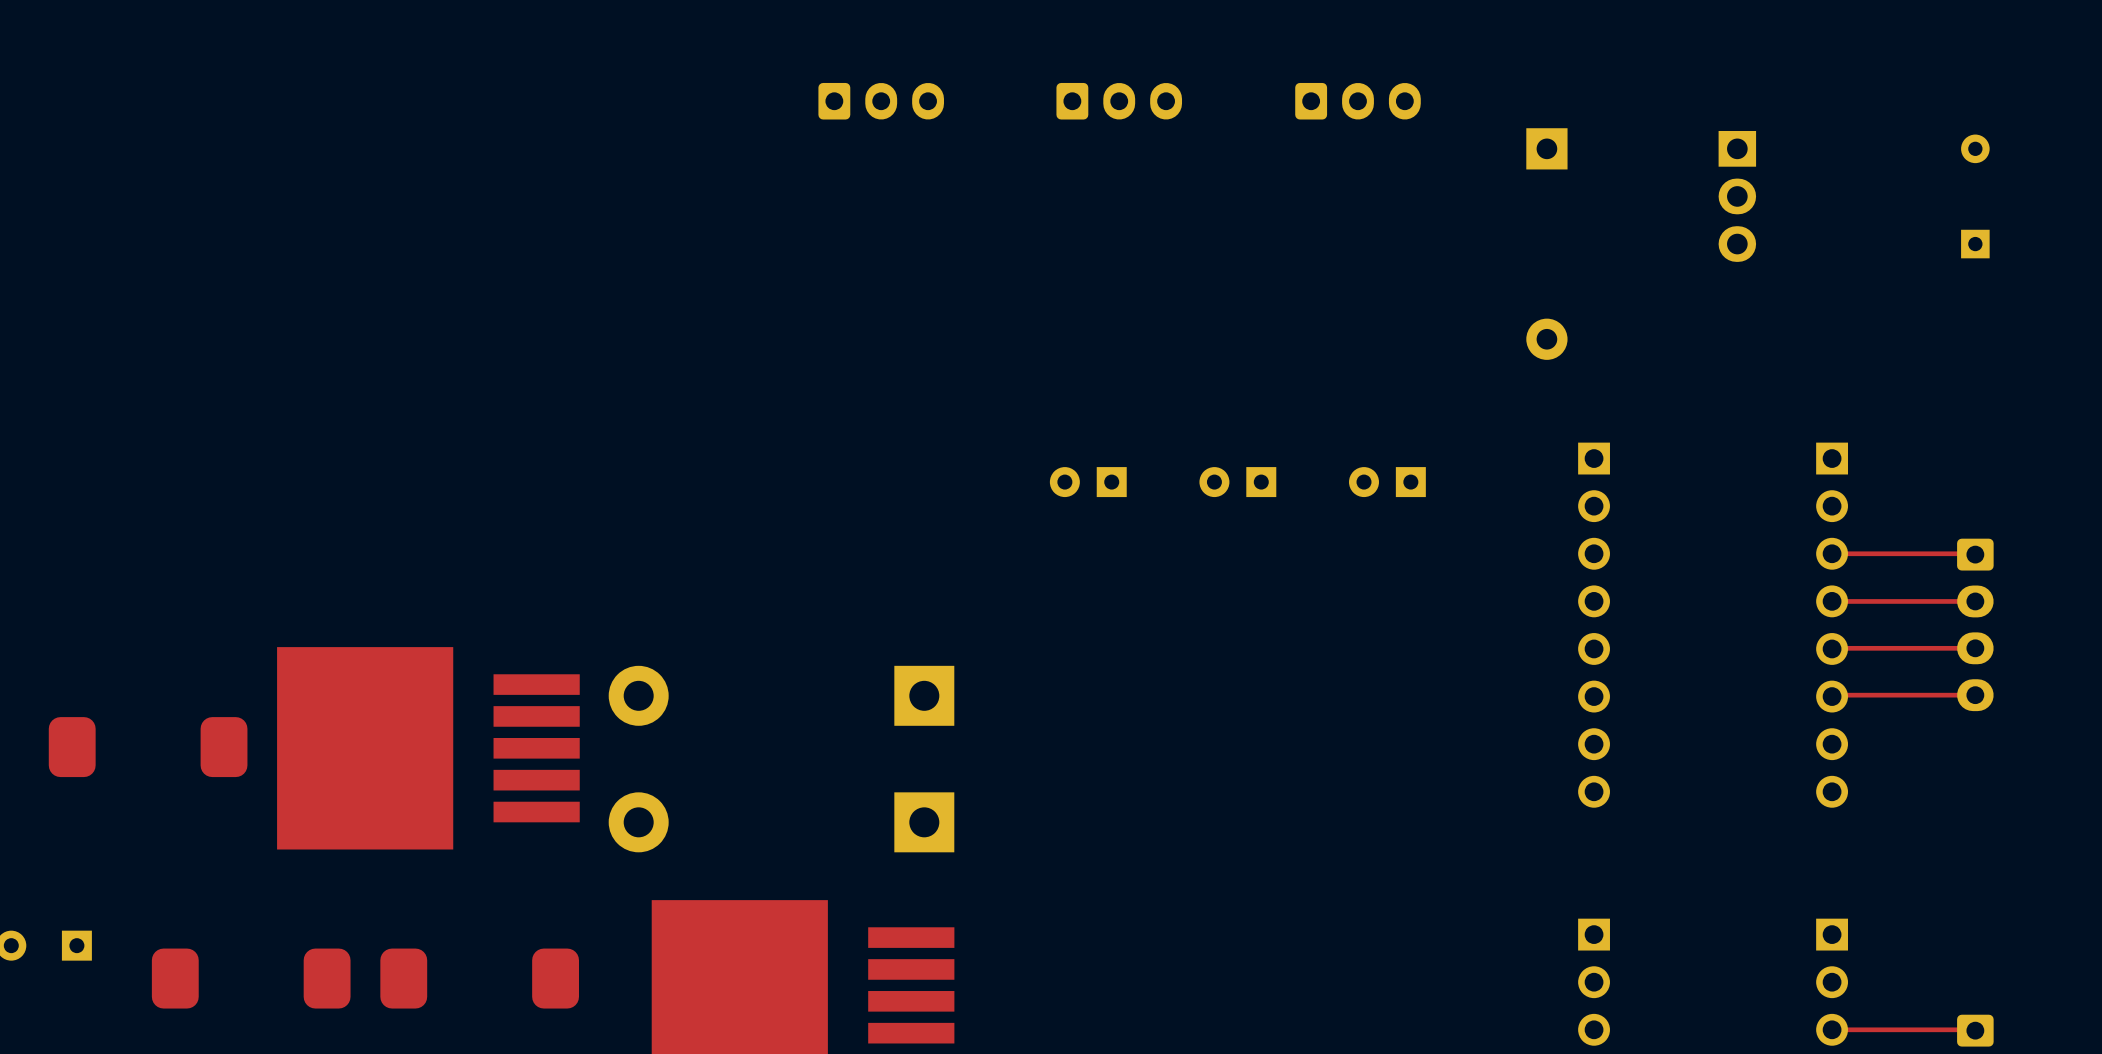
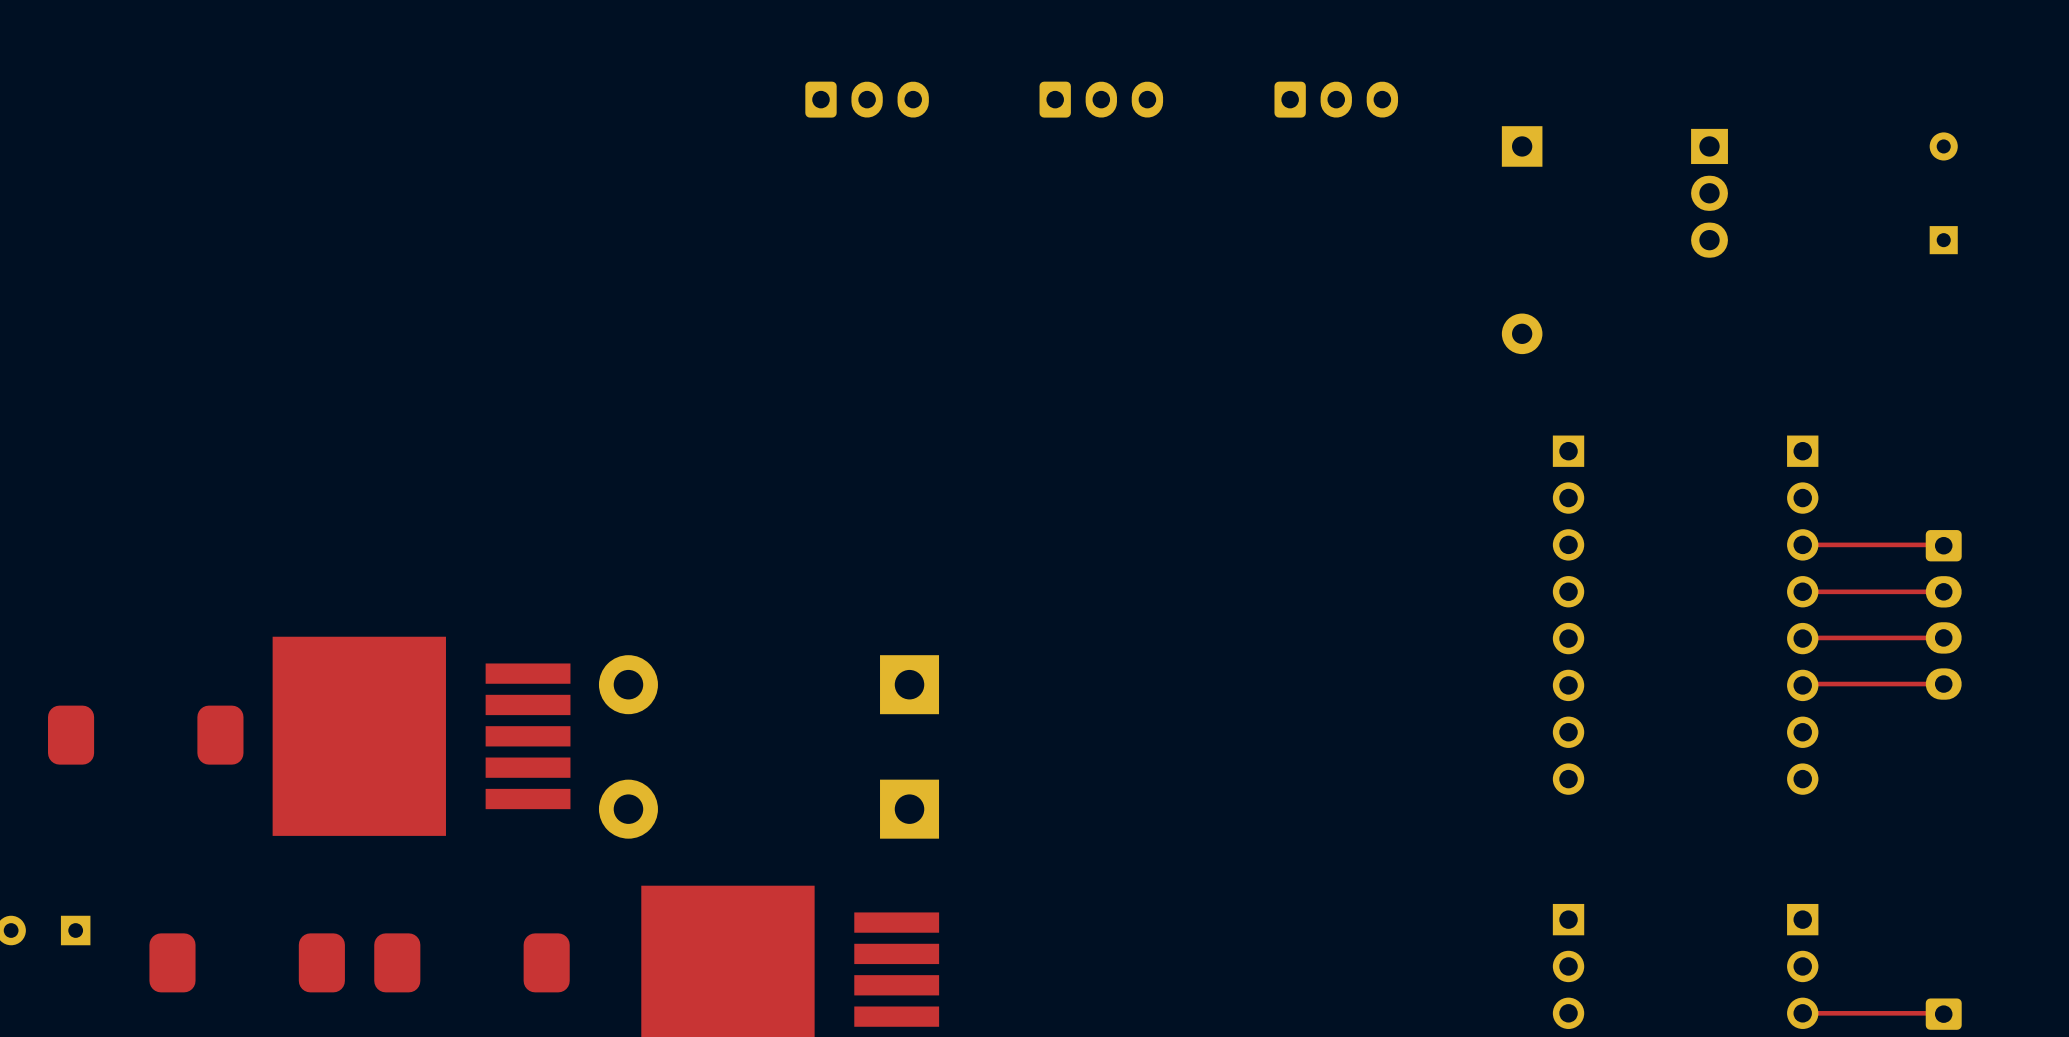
part: (1088, 482) -> none
part: (1237, 482) -> none
part: (1387, 482) -> none

